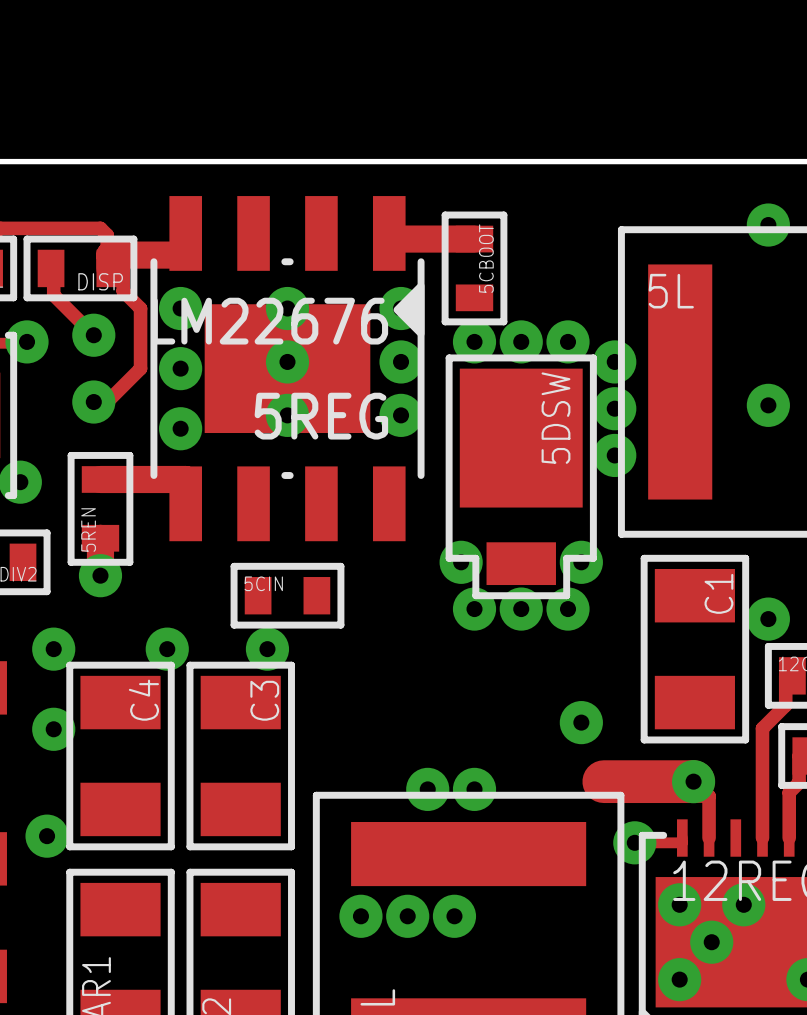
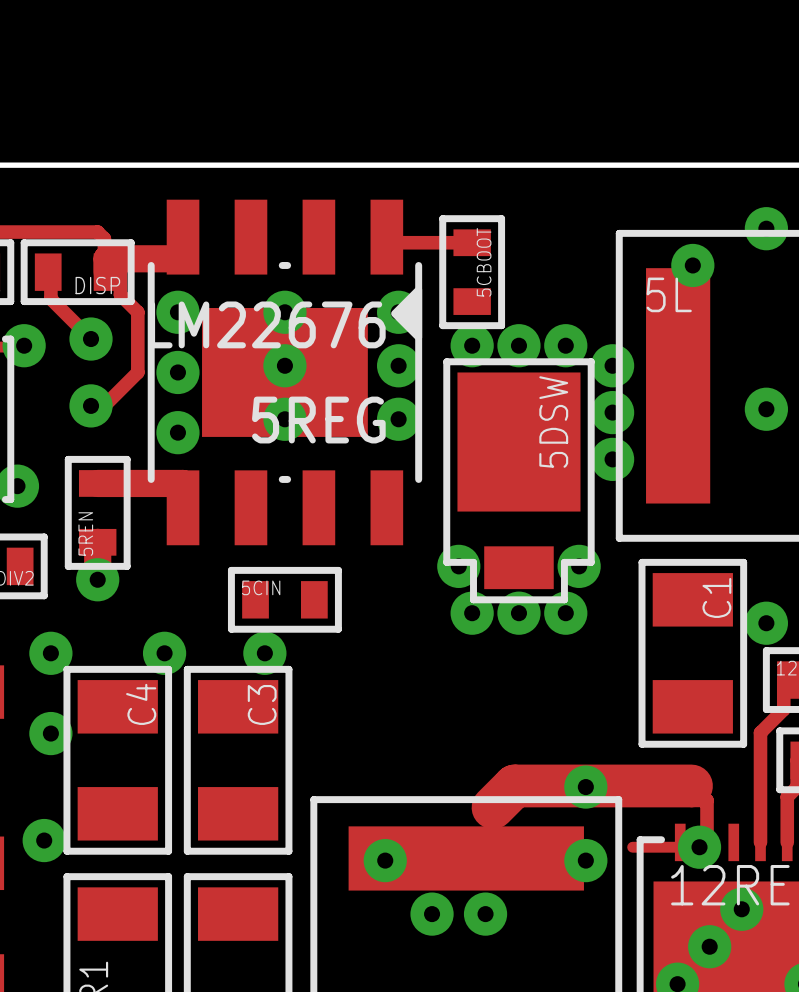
track width: thick (389, 233) (389, 239) (474, 239) -> thin (386, 237) (386, 242) (472, 242)
via: none -> (692, 265)
via: (581, 722) -> none
track: none -> (601, 785) (514, 785) (493, 807)
via: (693, 781) -> none
via: none -> (585, 787)
via: (427, 789) -> none
via: (474, 789) -> none
via: (634, 842) -> none
via: none -> (699, 847)
via: none -> (385, 860)
via: none -> (585, 860)
via: (679, 904) -> none
via: none -> (432, 914)
via: none -> (485, 914)
via: (360, 916) -> none
via: (407, 916) -> none
via: (454, 916) -> none

